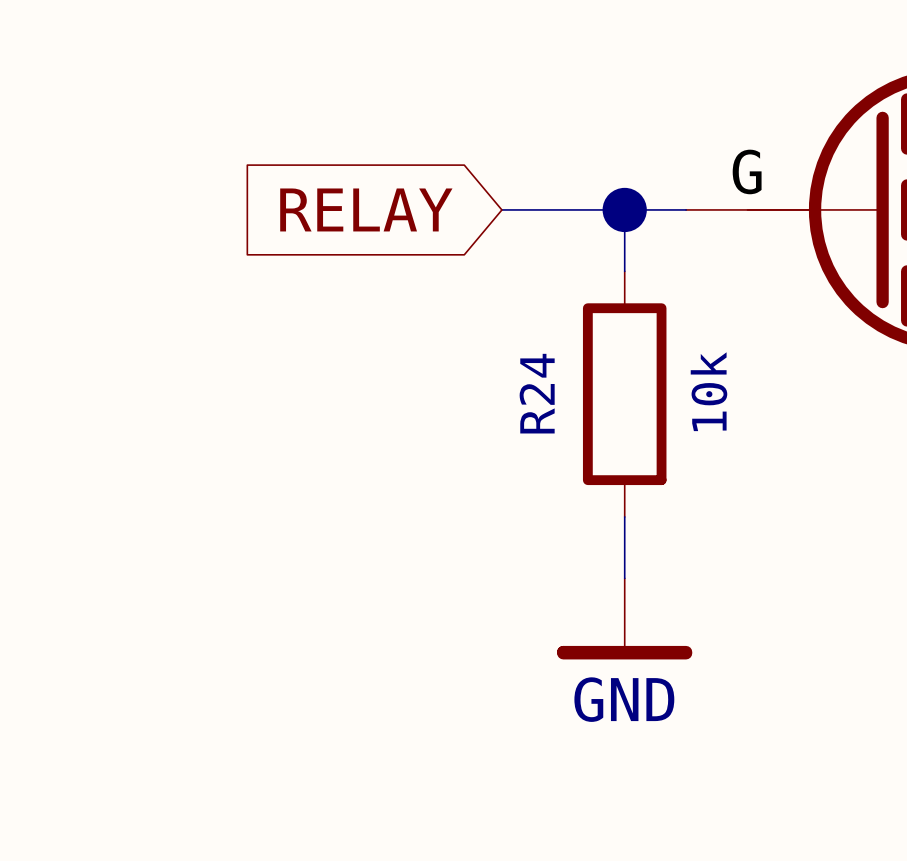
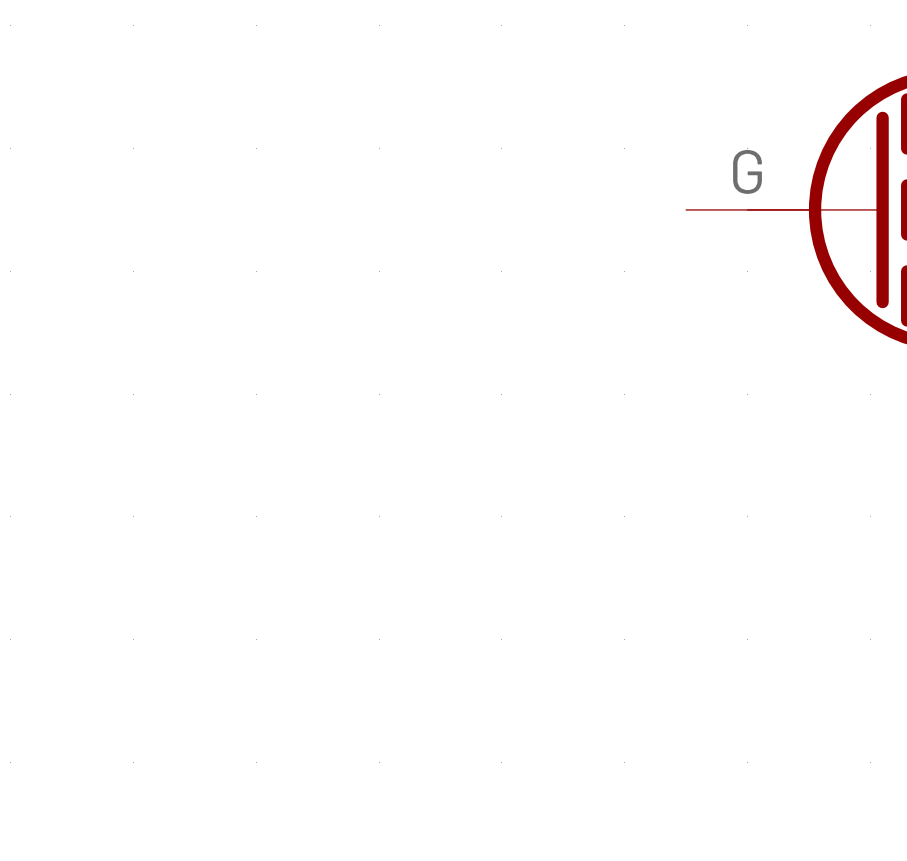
global label: RELAY (366, 209) -> none
wire: (501, 209) (686, 209) -> none
wire: (624, 209) (624, 271) -> none
junction: (624, 209) -> none
R24: 10k (624, 394) -> none
wire: (624, 516) (624, 578) -> none
power symbol: GND (624, 618) -> none

